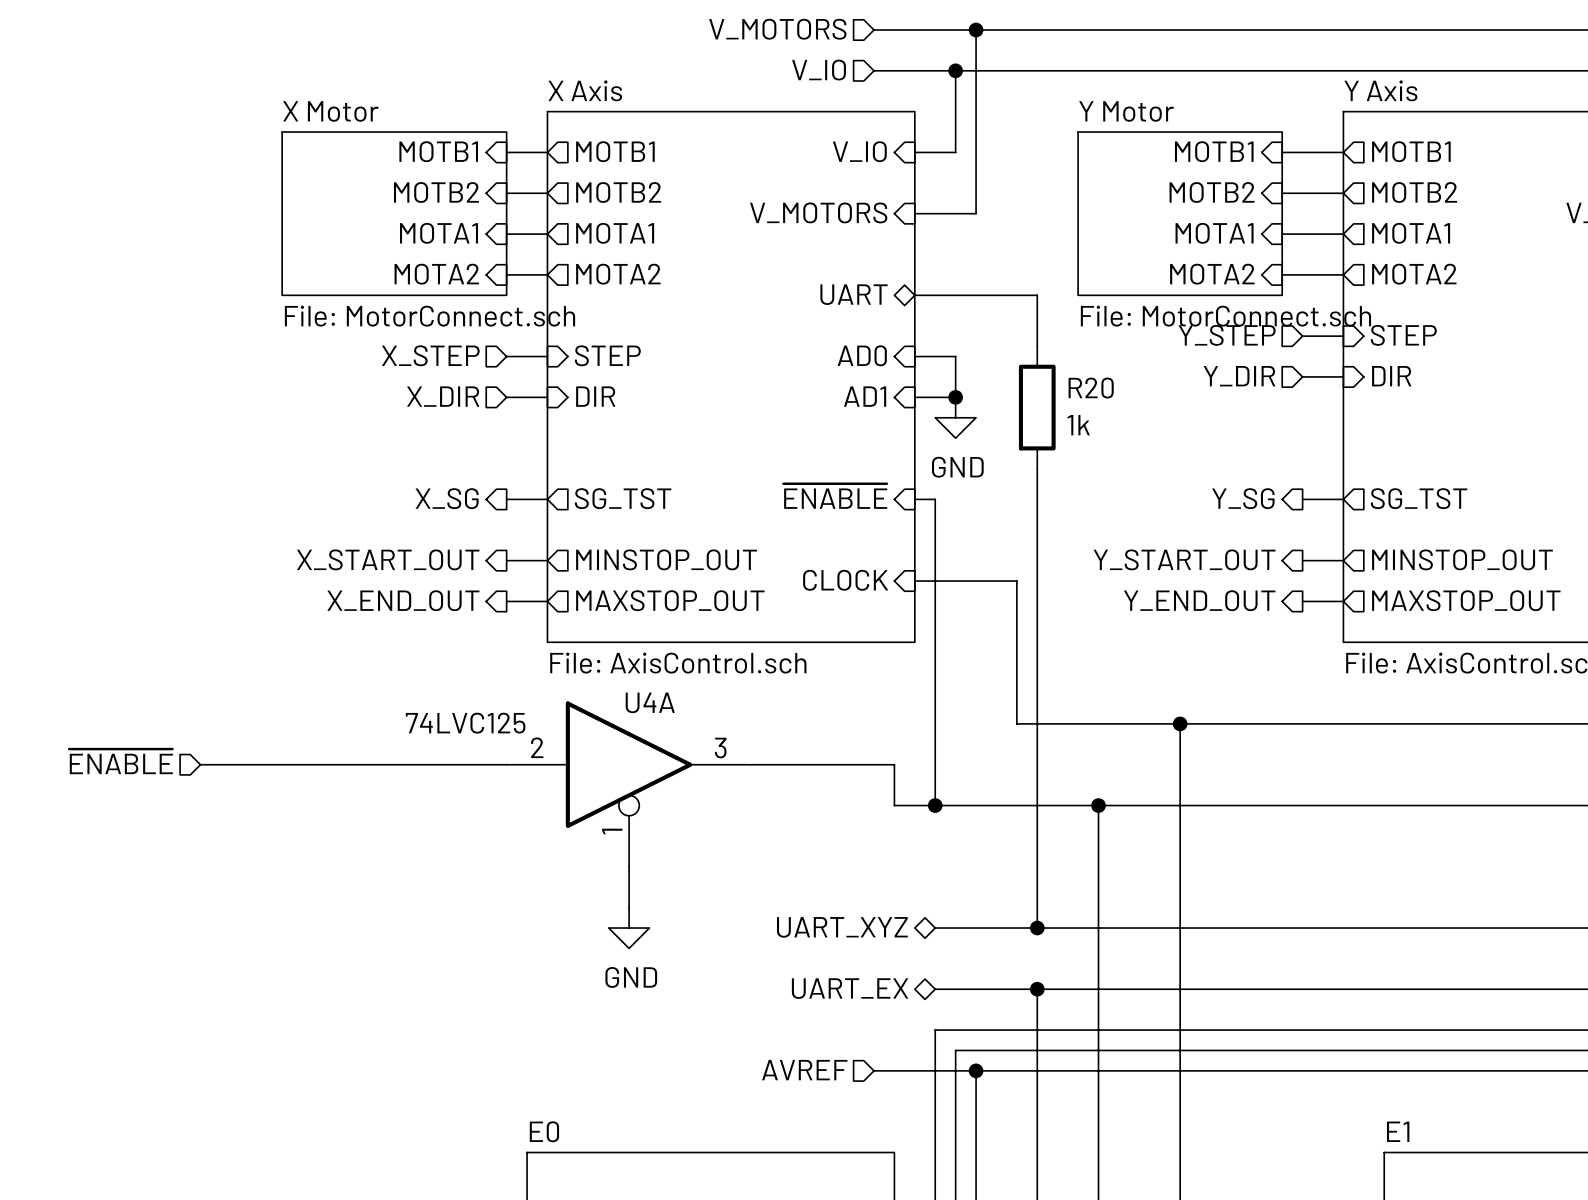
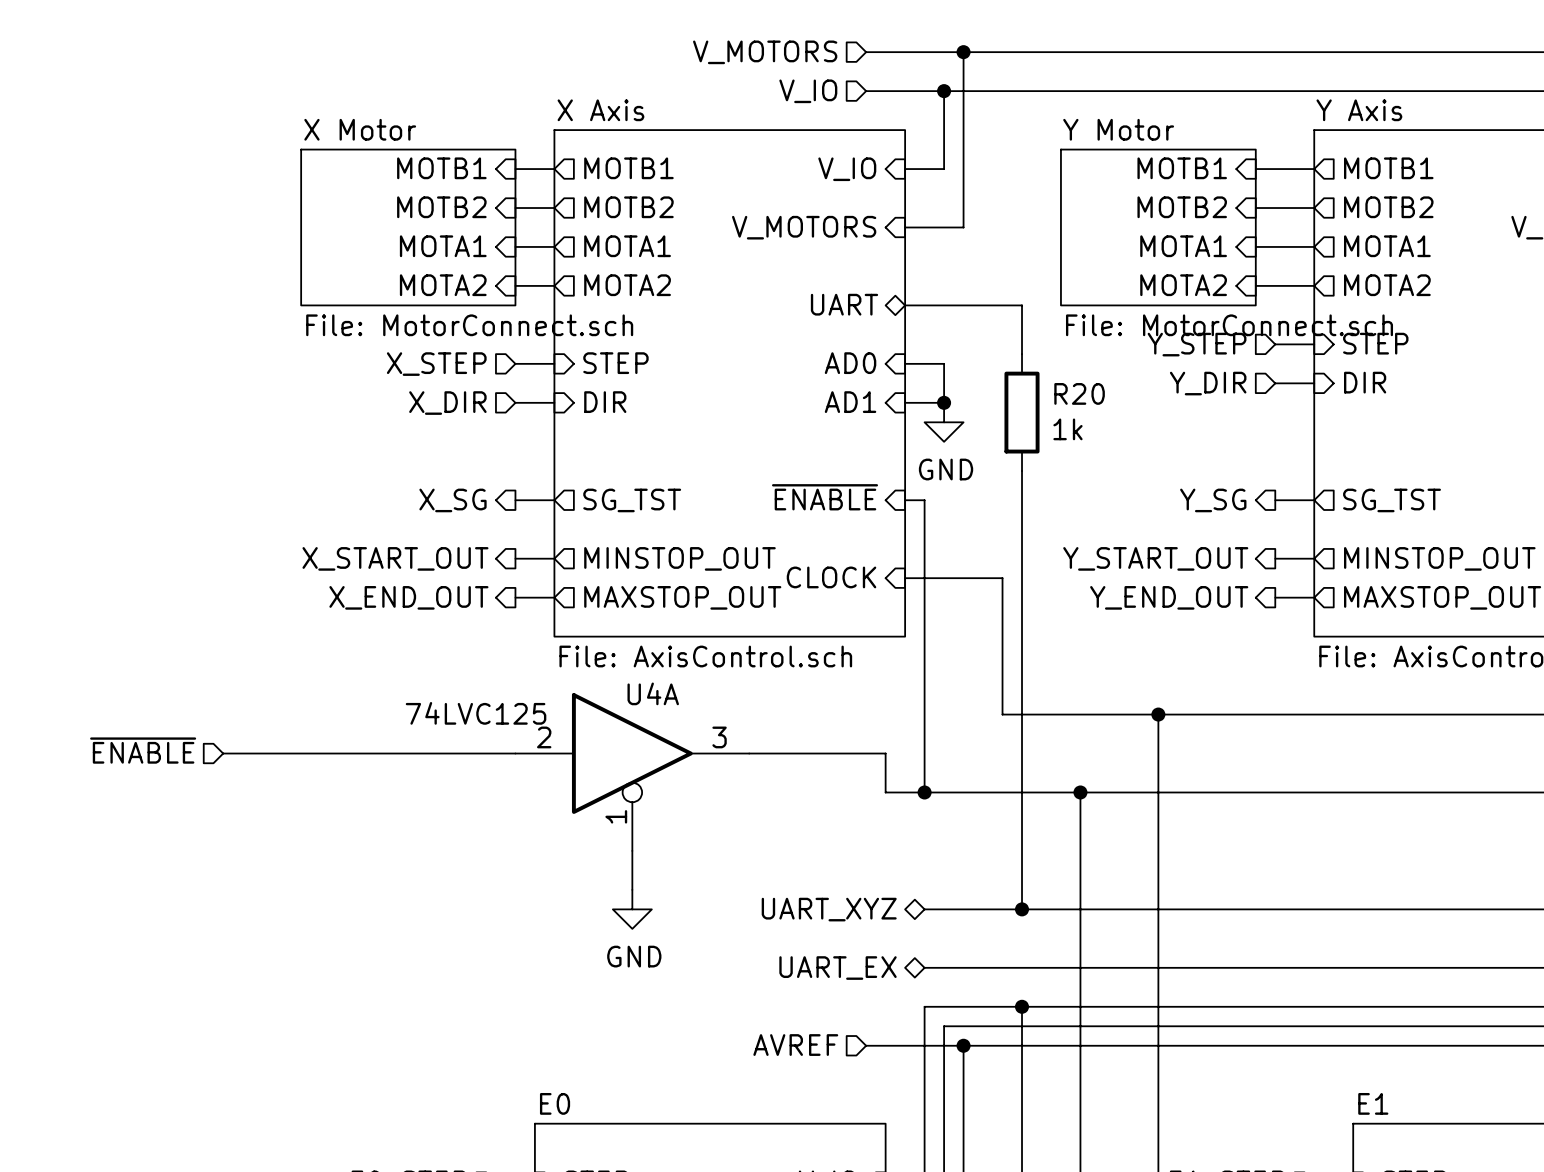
wire: (1037, 989) (1037, 1030) -> none
junction position: (1037, 989) -> (1022, 1006)

